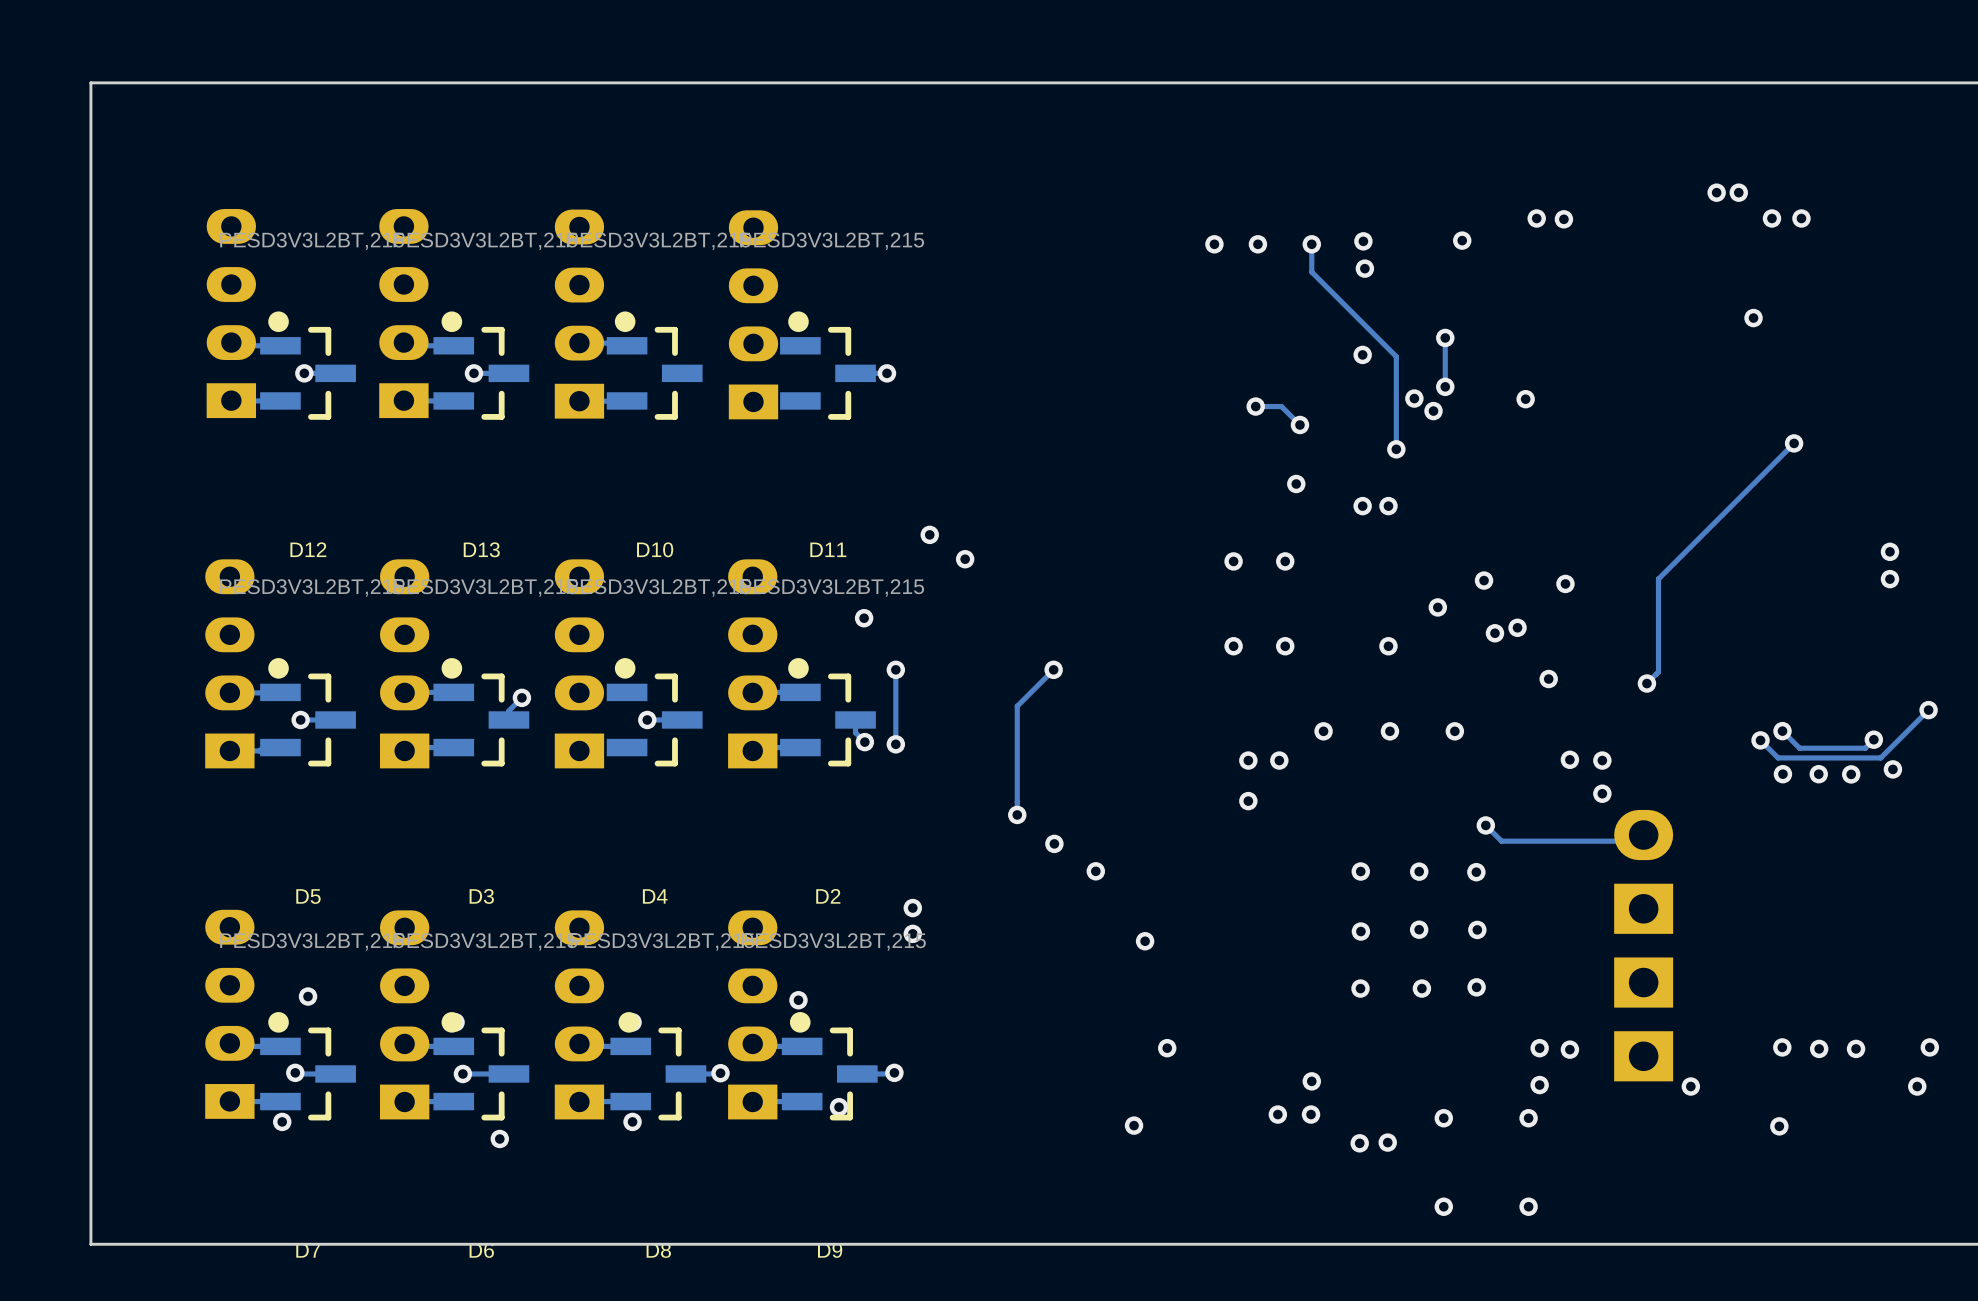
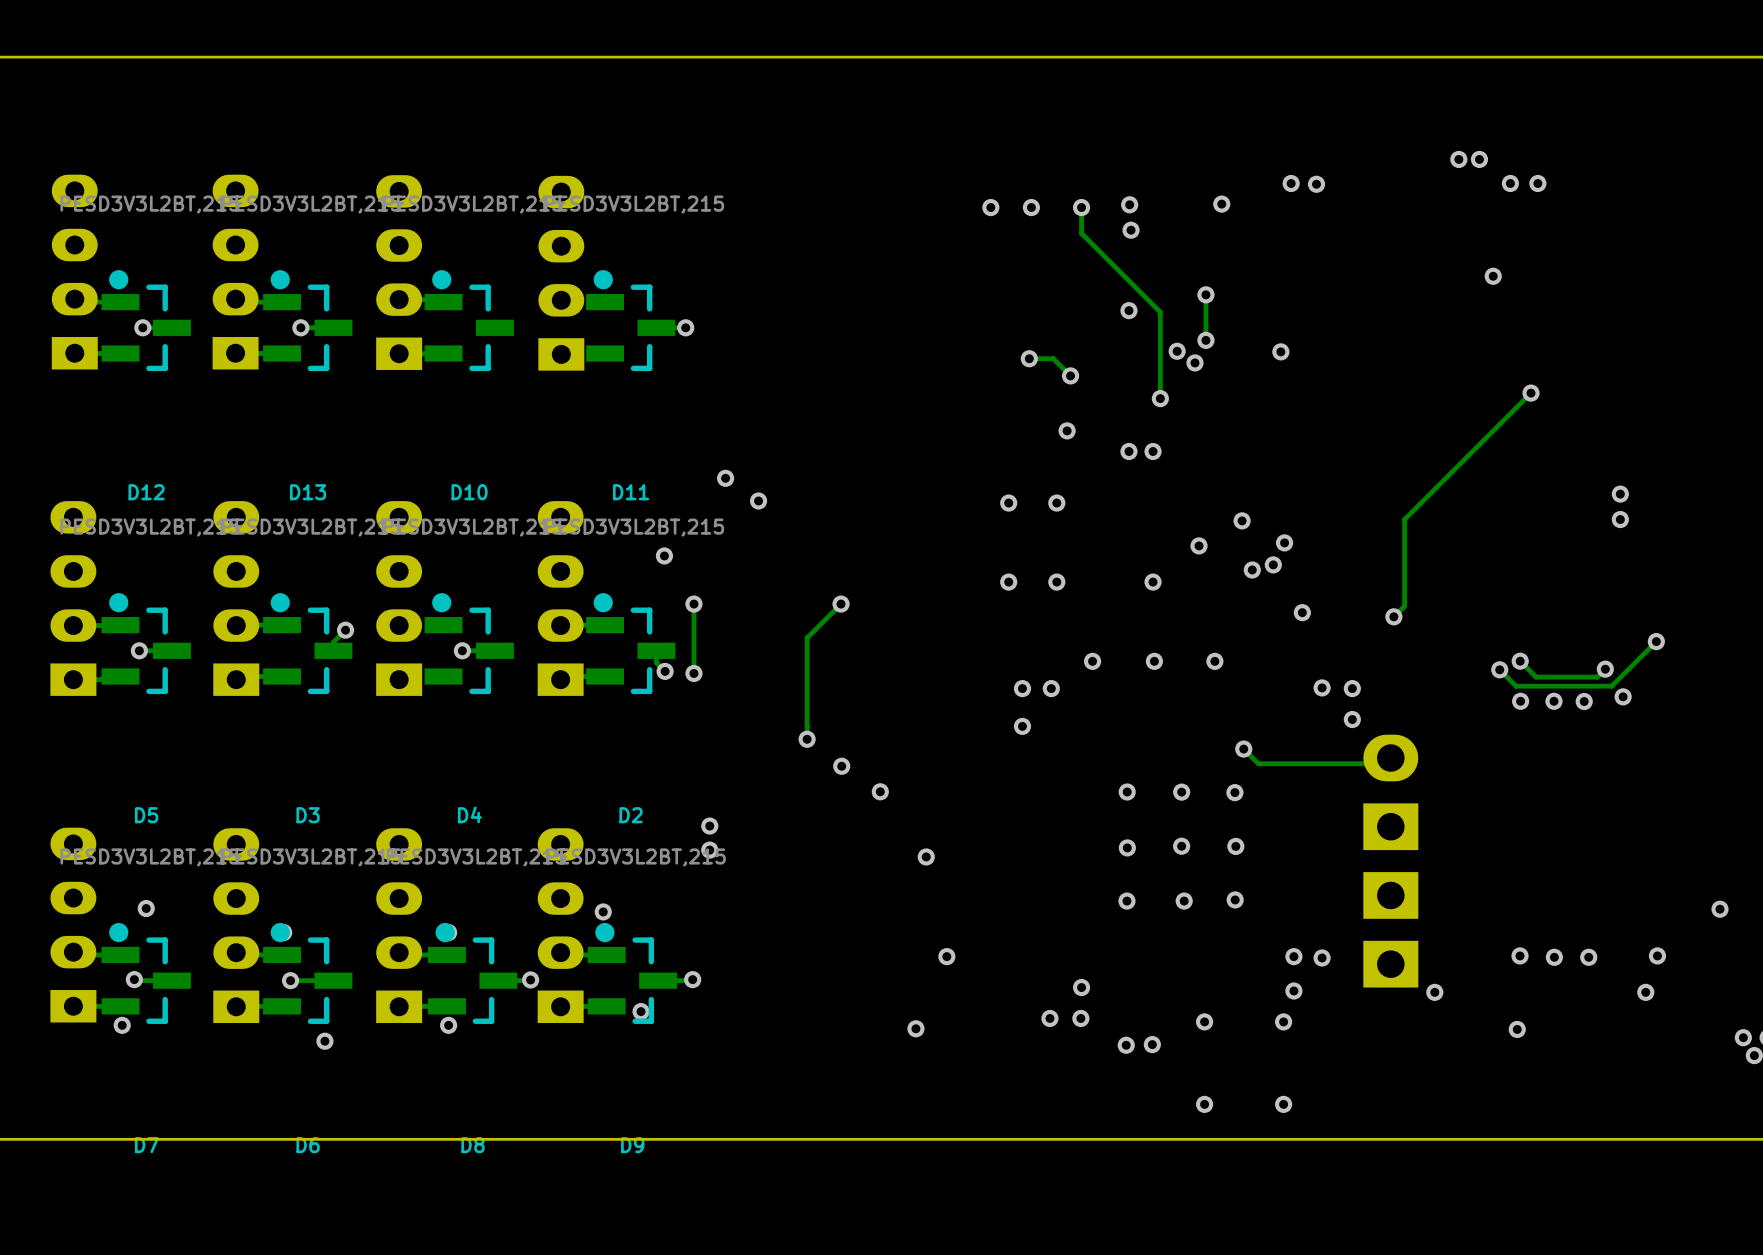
via position: (1565, 583) -> (1284, 542)

